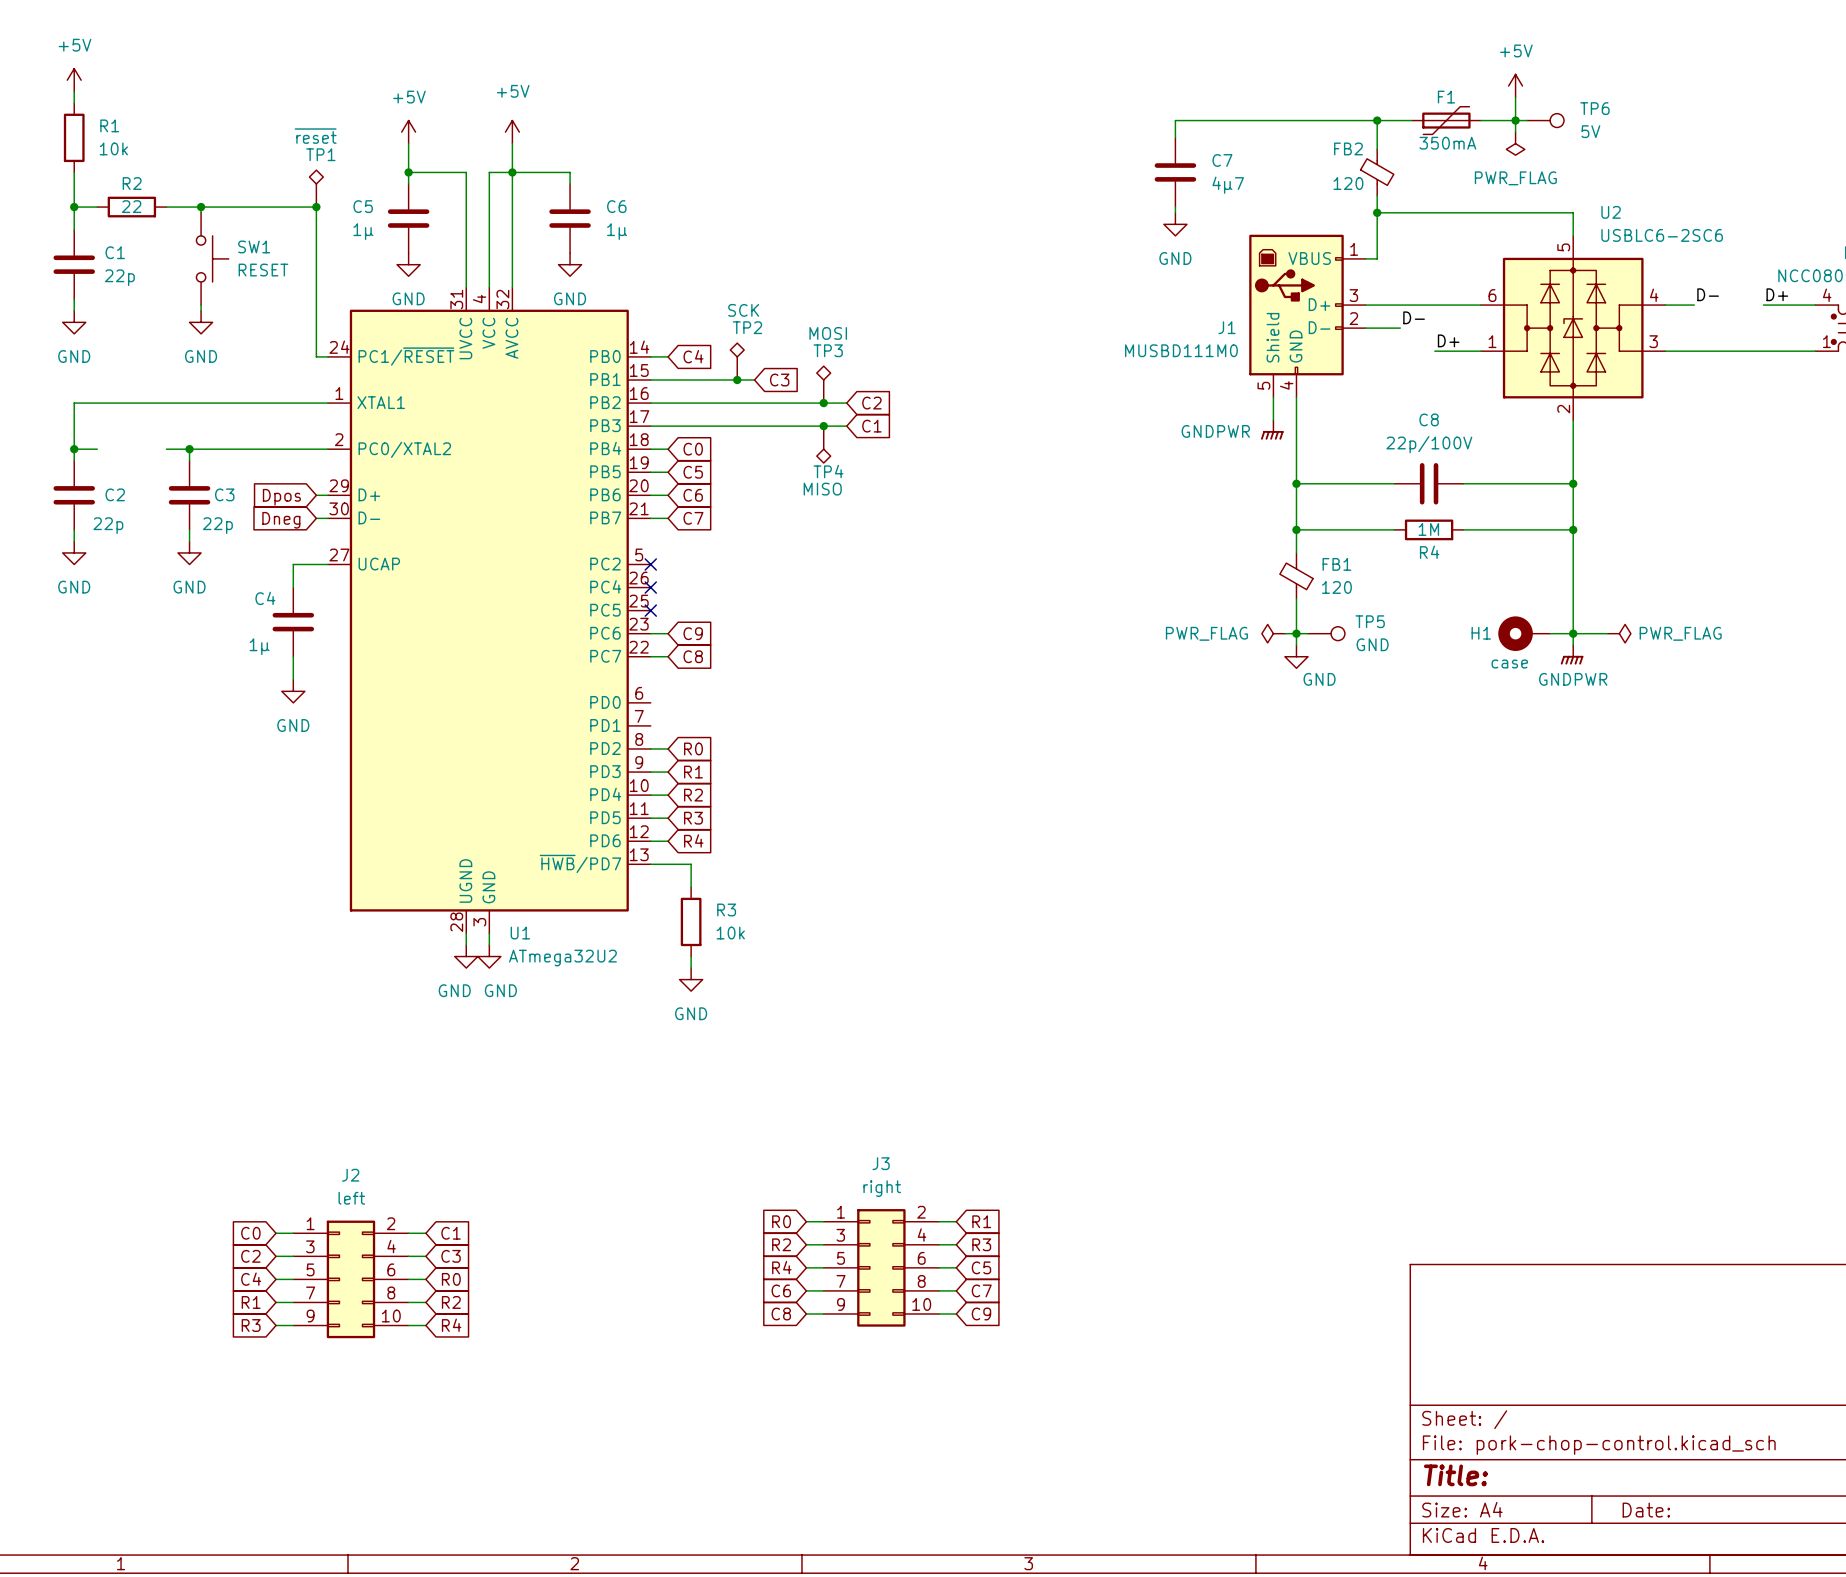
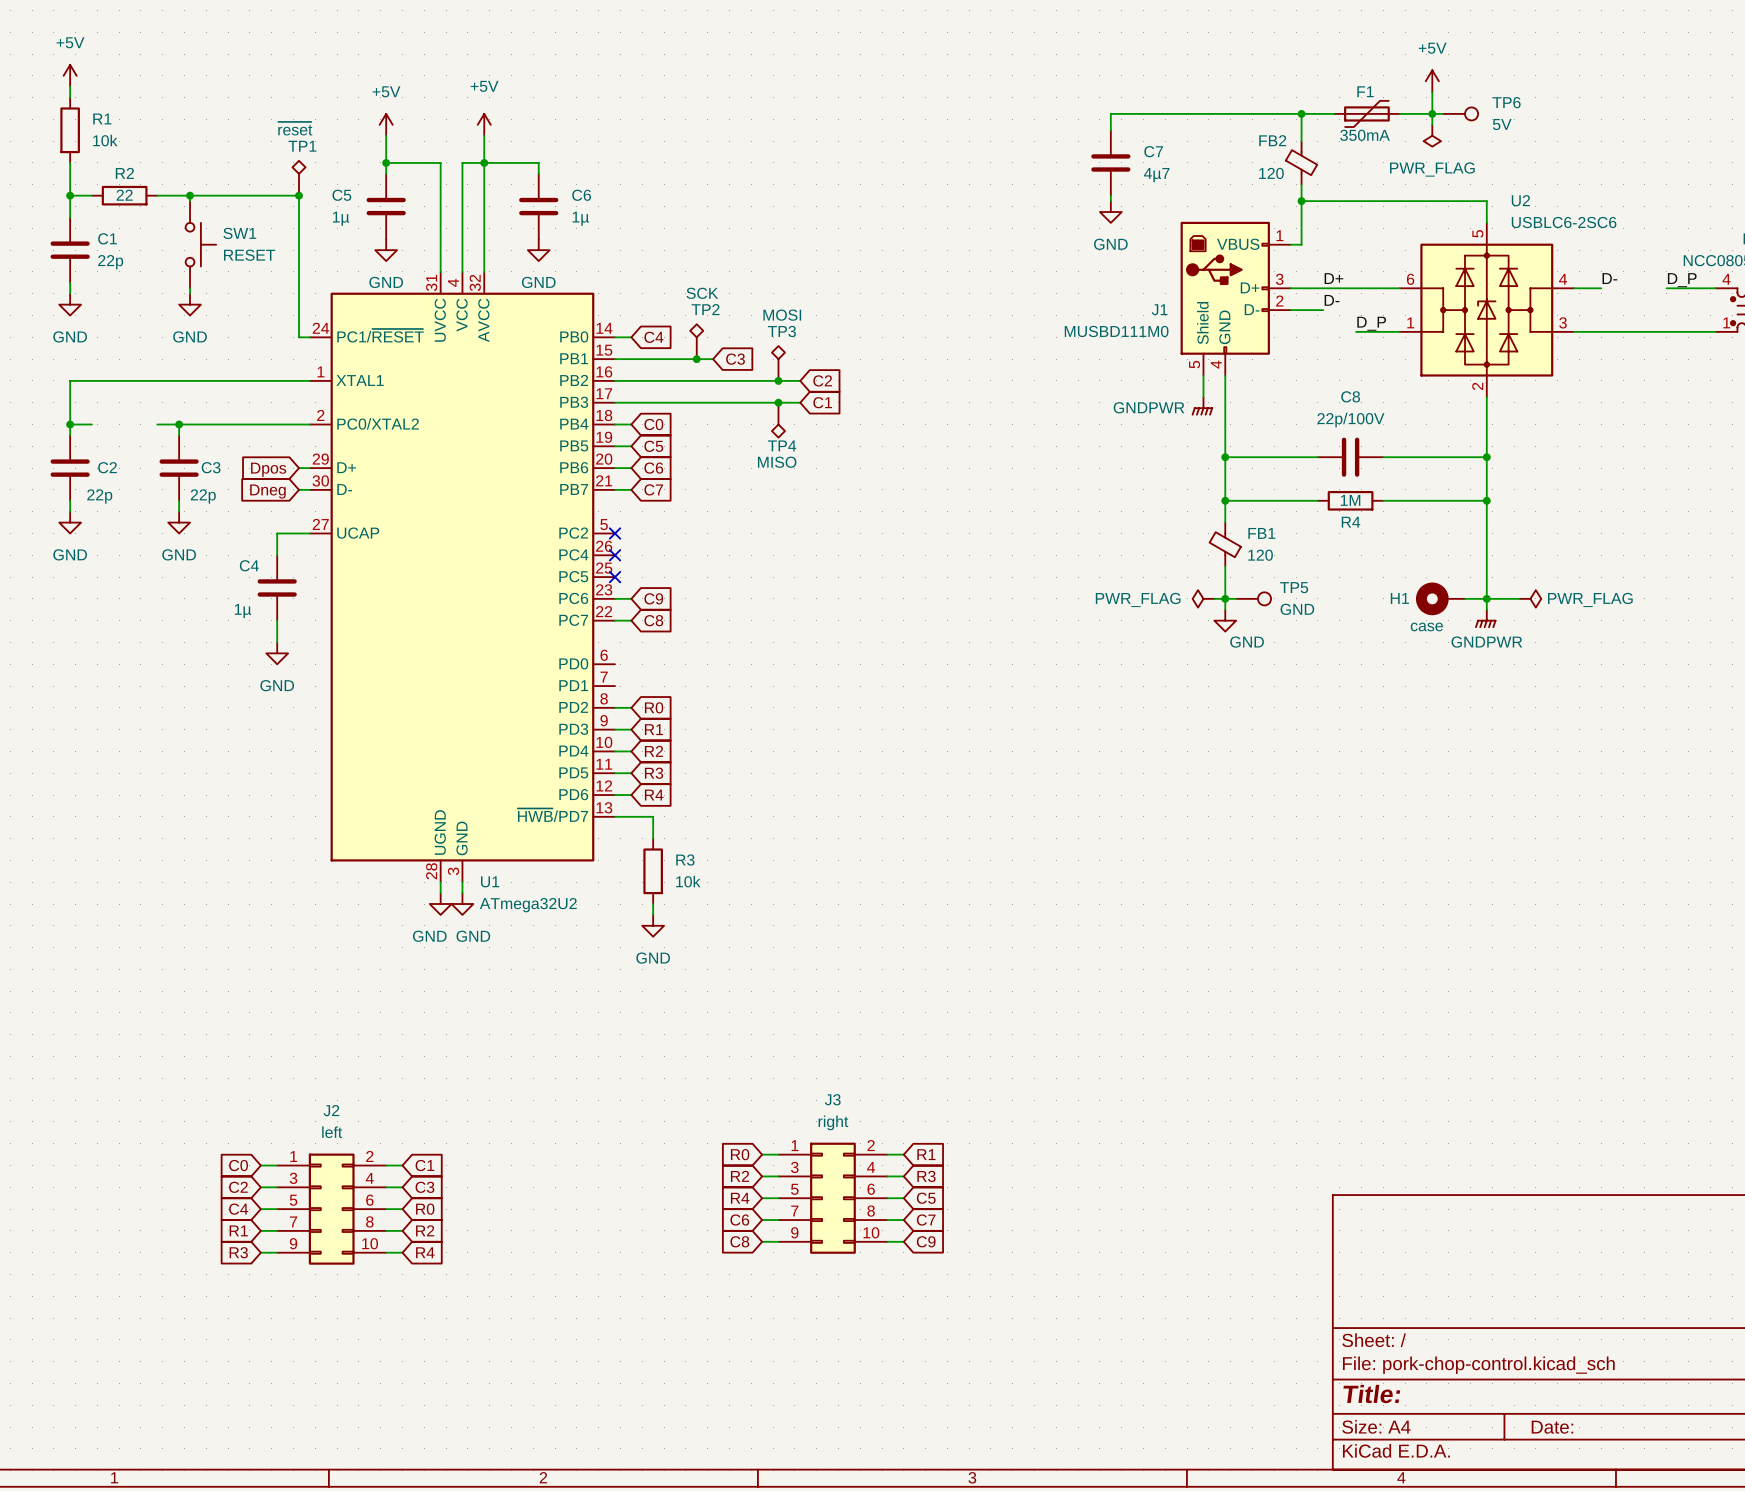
label: none -> D+ (1333, 278)
label: D+ (1777, 294) -> D_P (1682, 280)
label: D+ (1448, 340) -> D_P (1371, 323)

